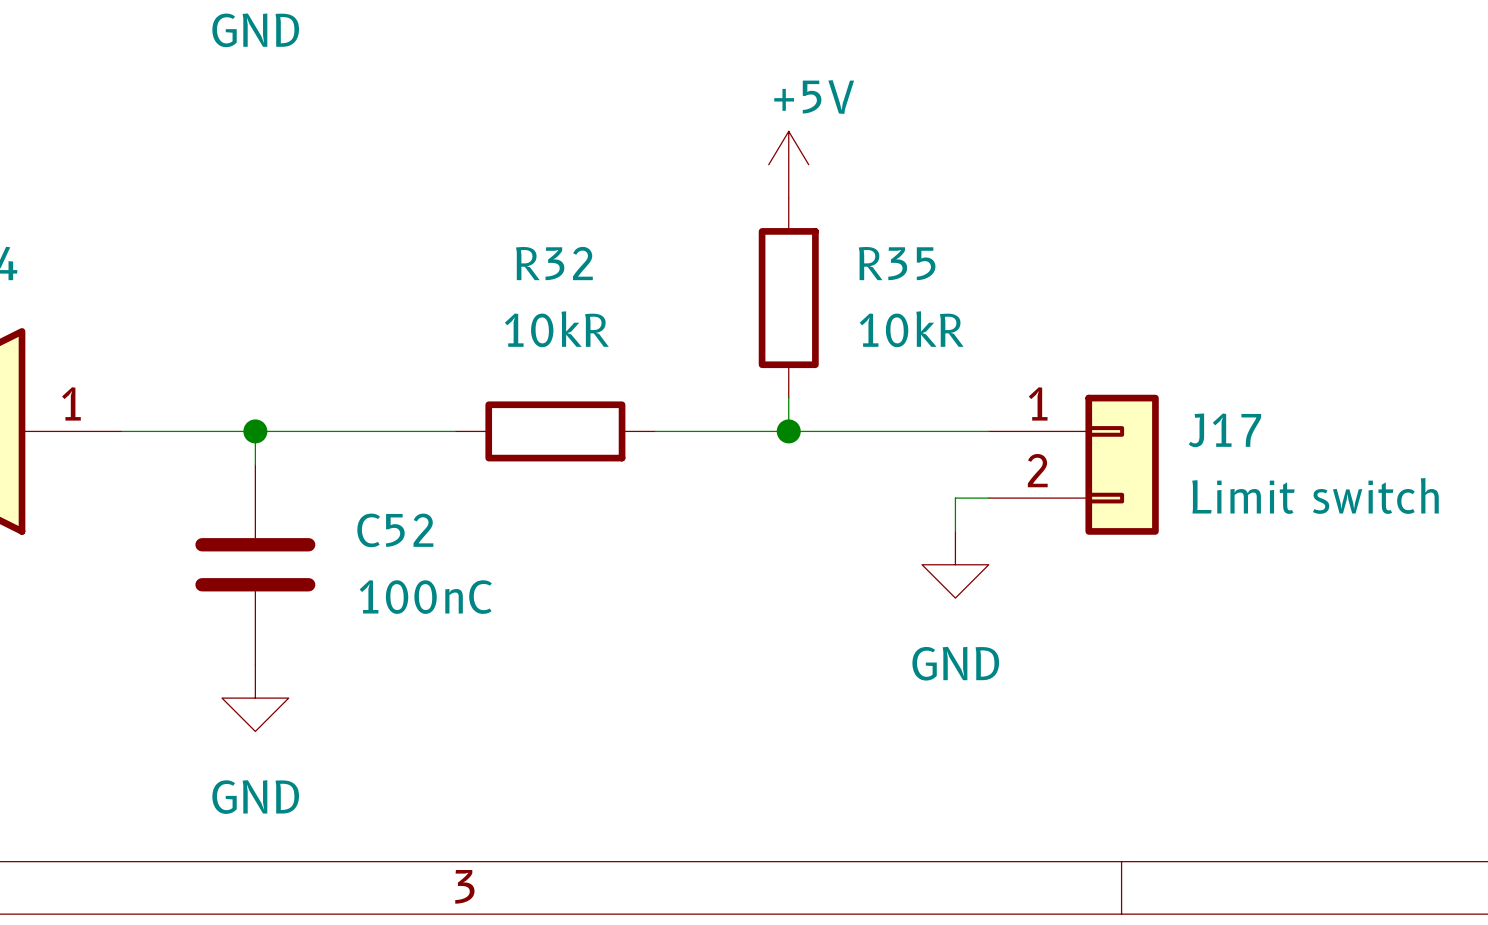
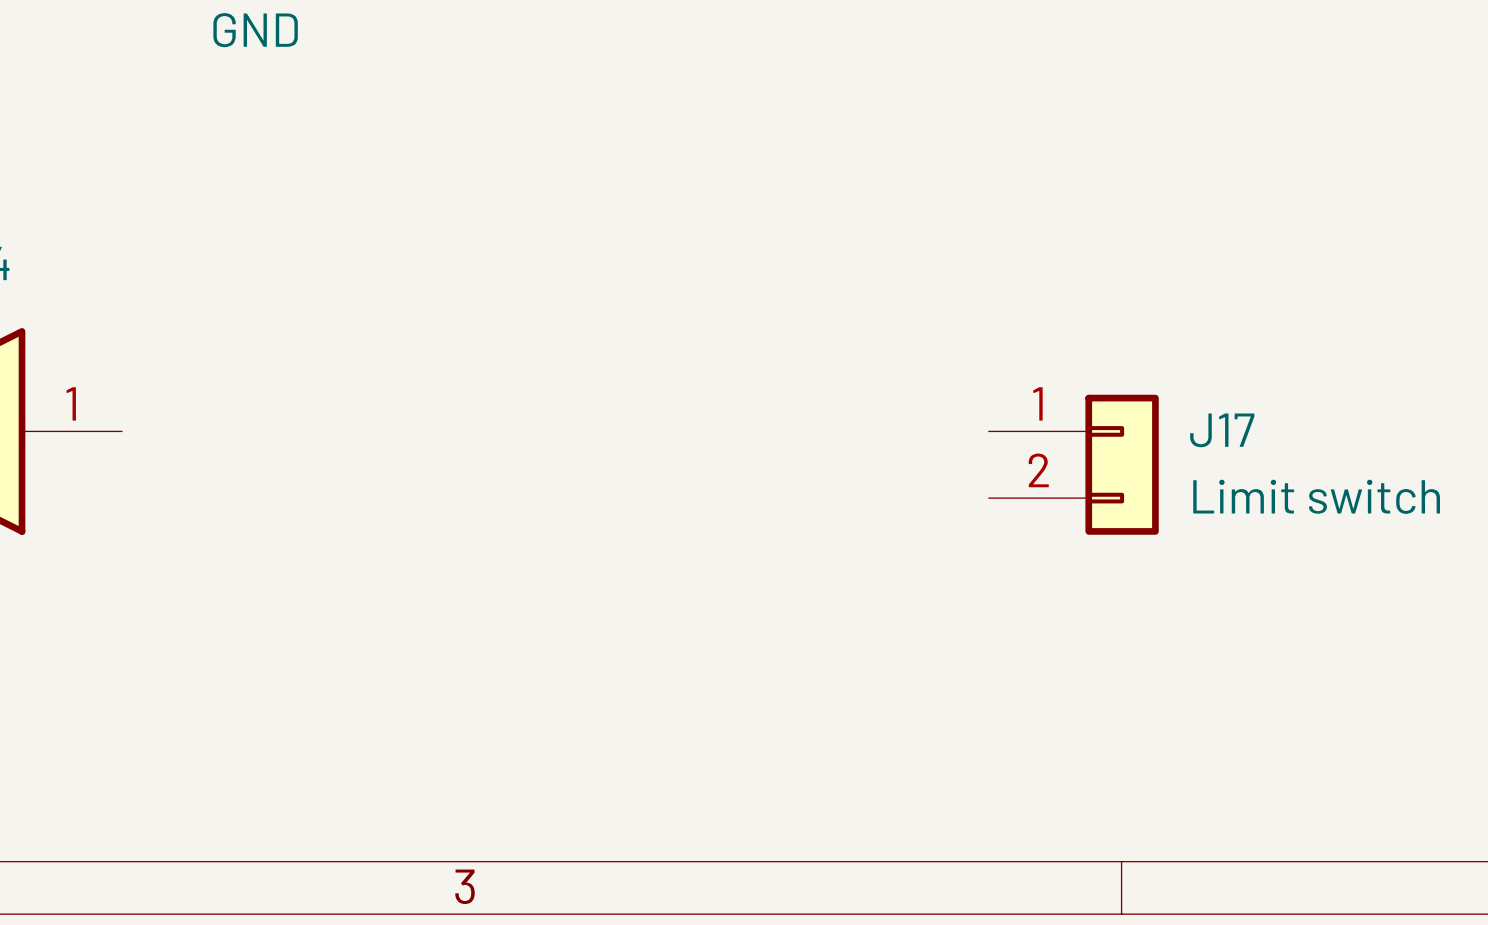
power symbol: +5V (788, 164) -> none
R35: 10kR (788, 298) -> none
wire: (788, 398) (788, 431) -> none
wire: (122, 431) (455, 431) -> none
wire: (255, 431) (255, 464) -> none
junction: (255, 431) -> none
R32: 10kR (555, 431) -> none
wire: (655, 431) (988, 431) -> none
junction: (788, 431) -> none
wire: (988, 498) (955, 498) (955, 531) -> none
C52: 100nC (255, 564) -> none
power symbol: GND (955, 564) -> none
power symbol: GND (255, 698) -> none

